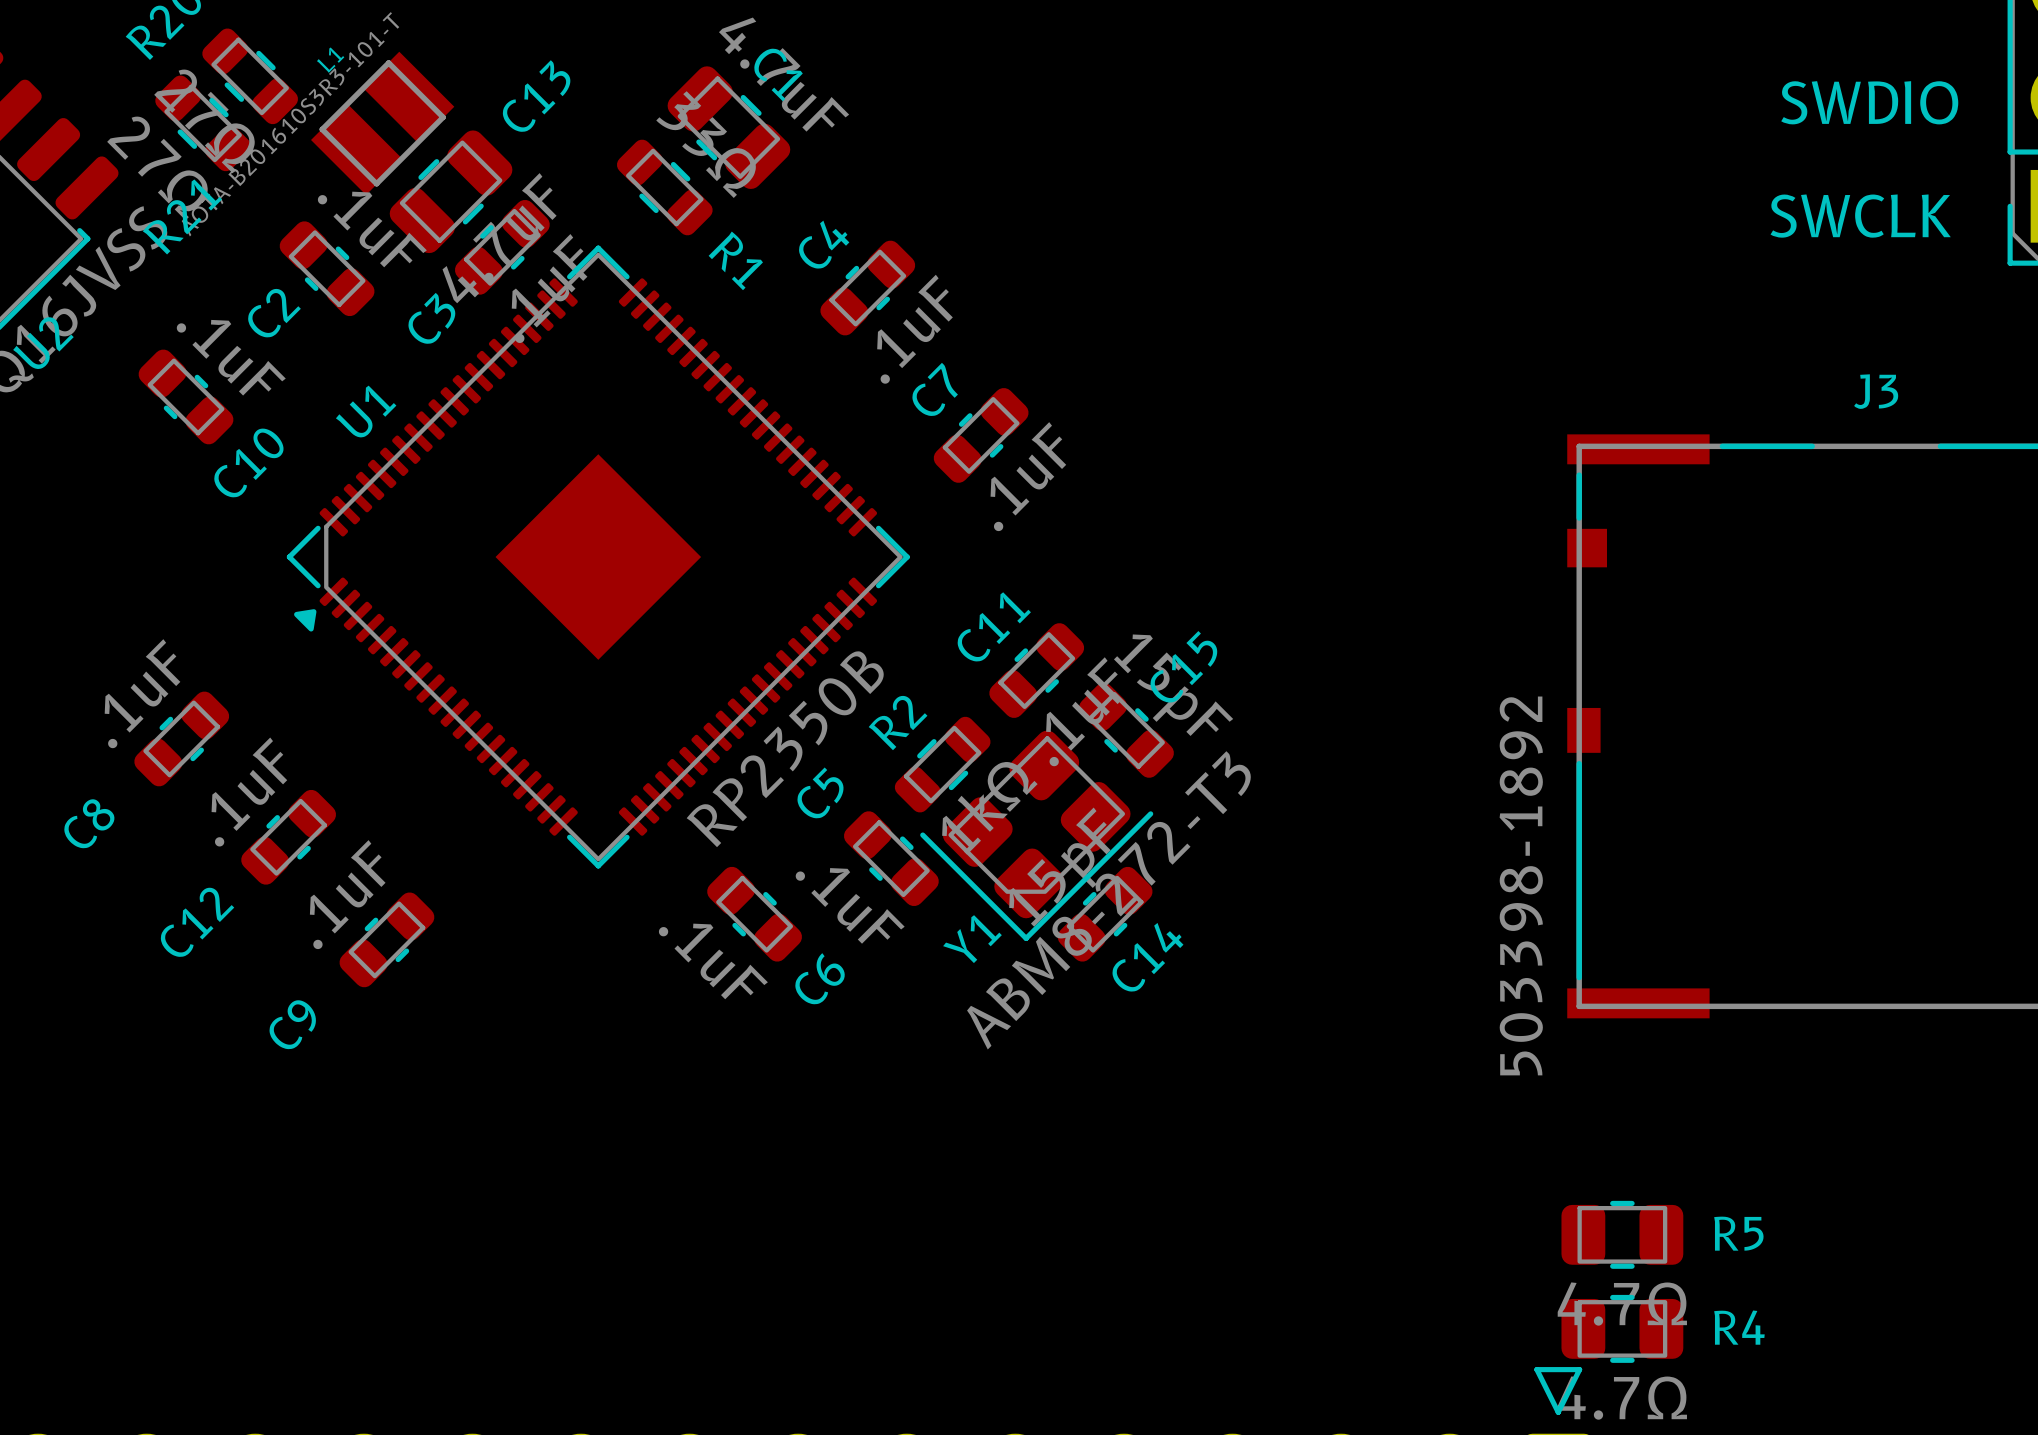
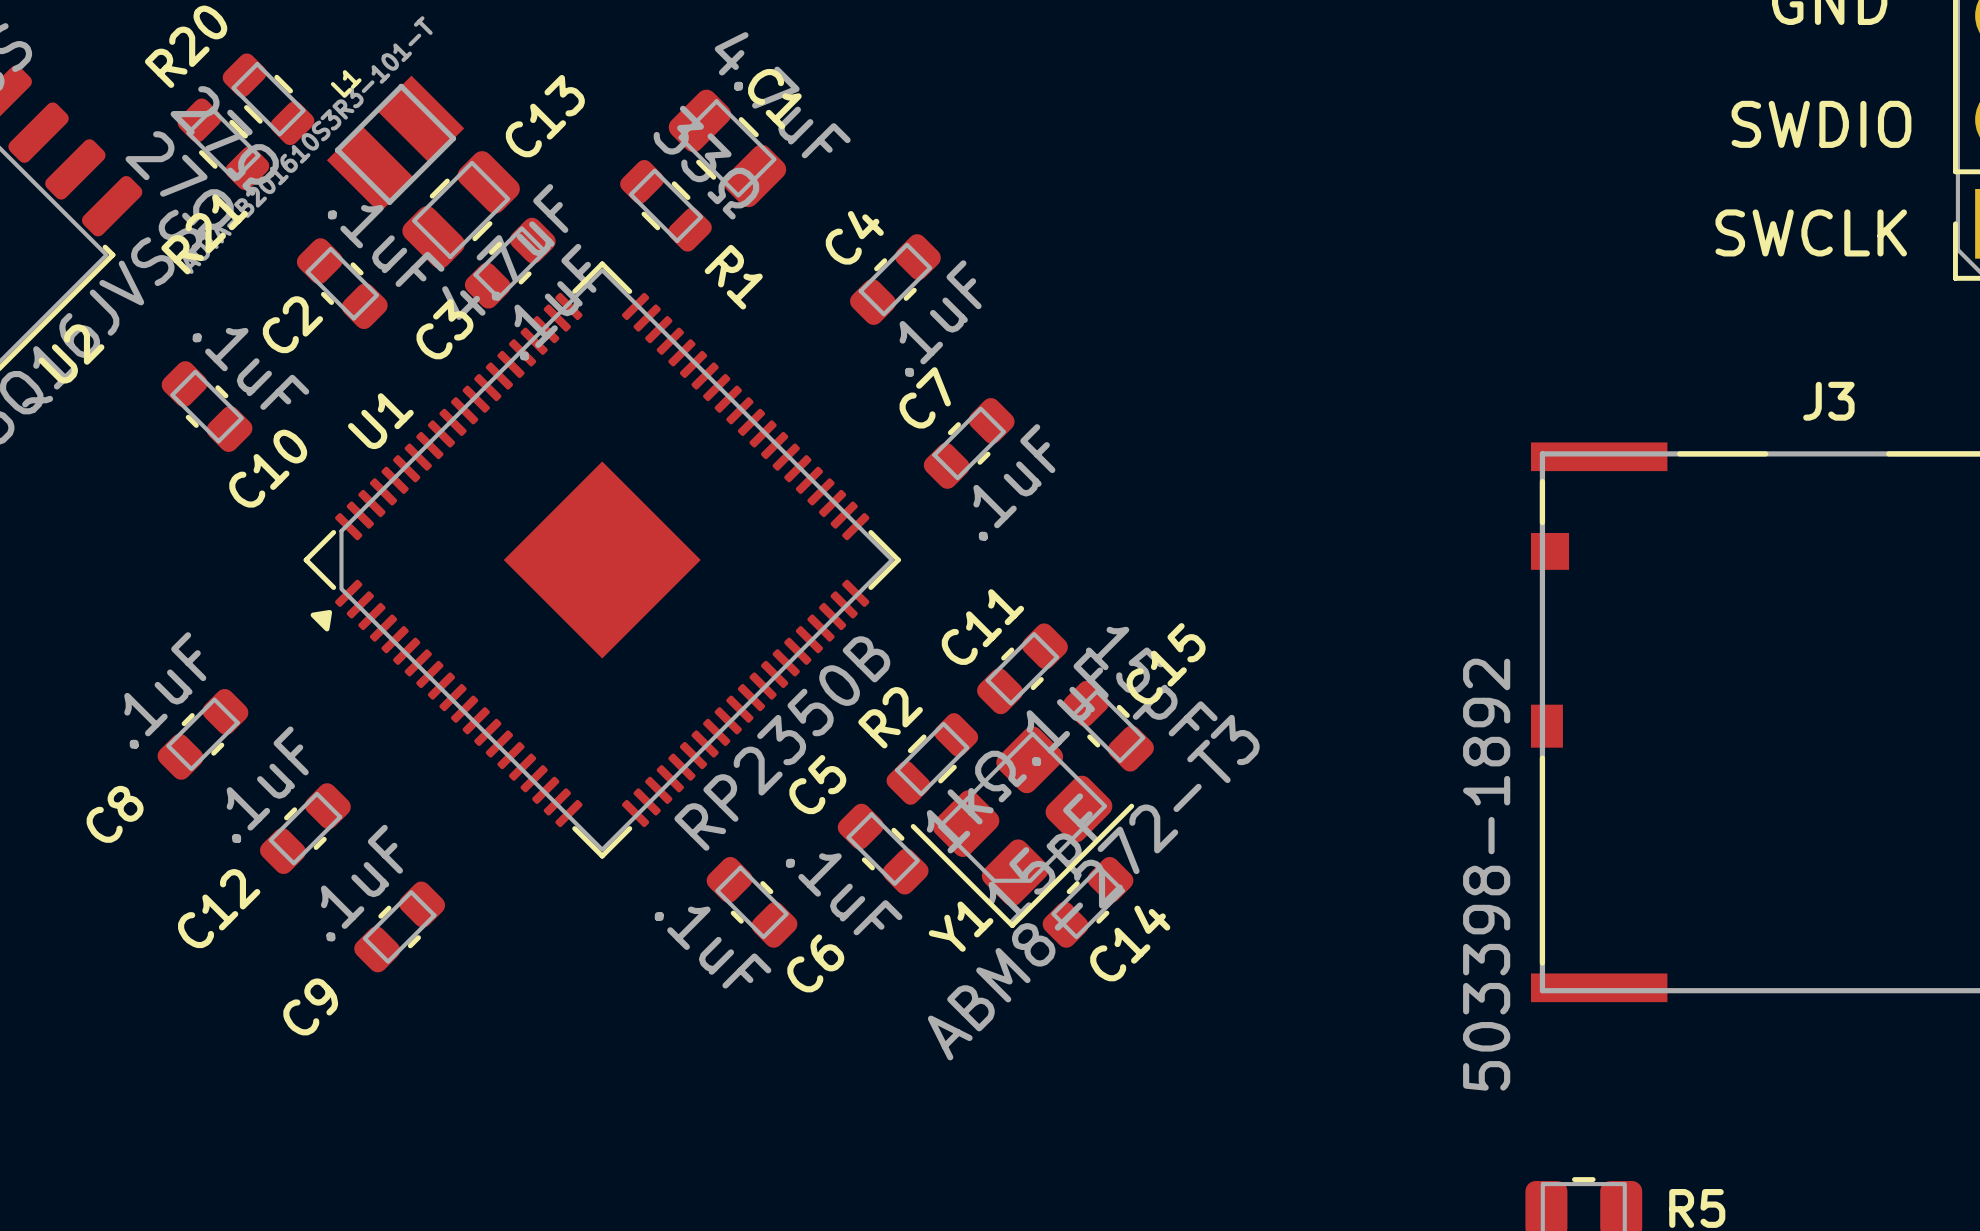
C4 position: (867, 288) -> (895, 279)

